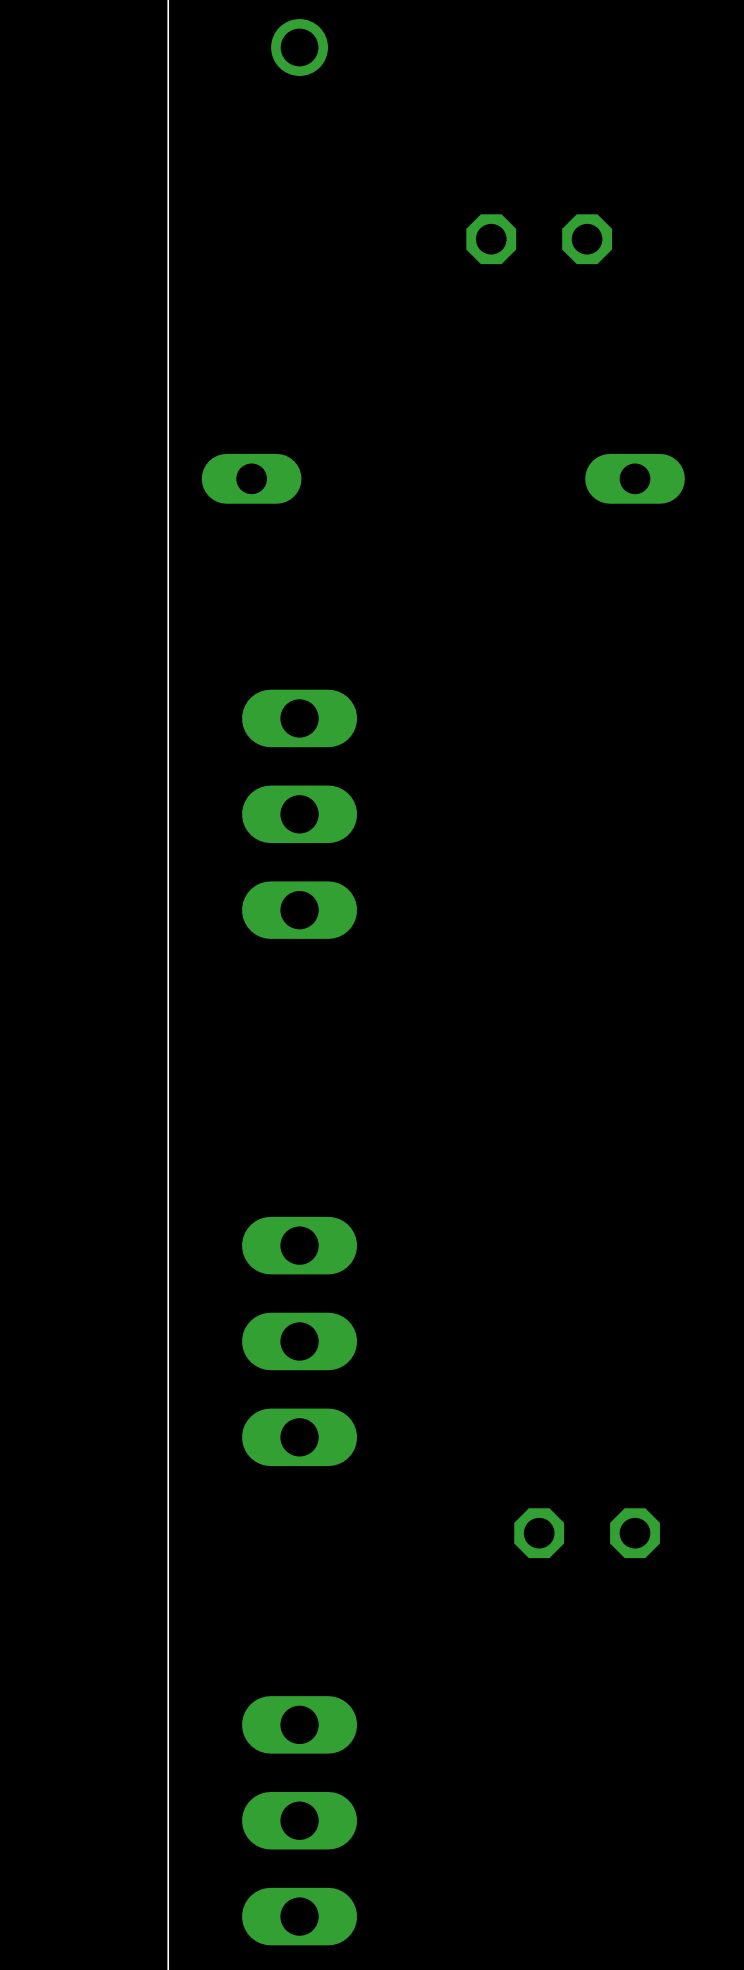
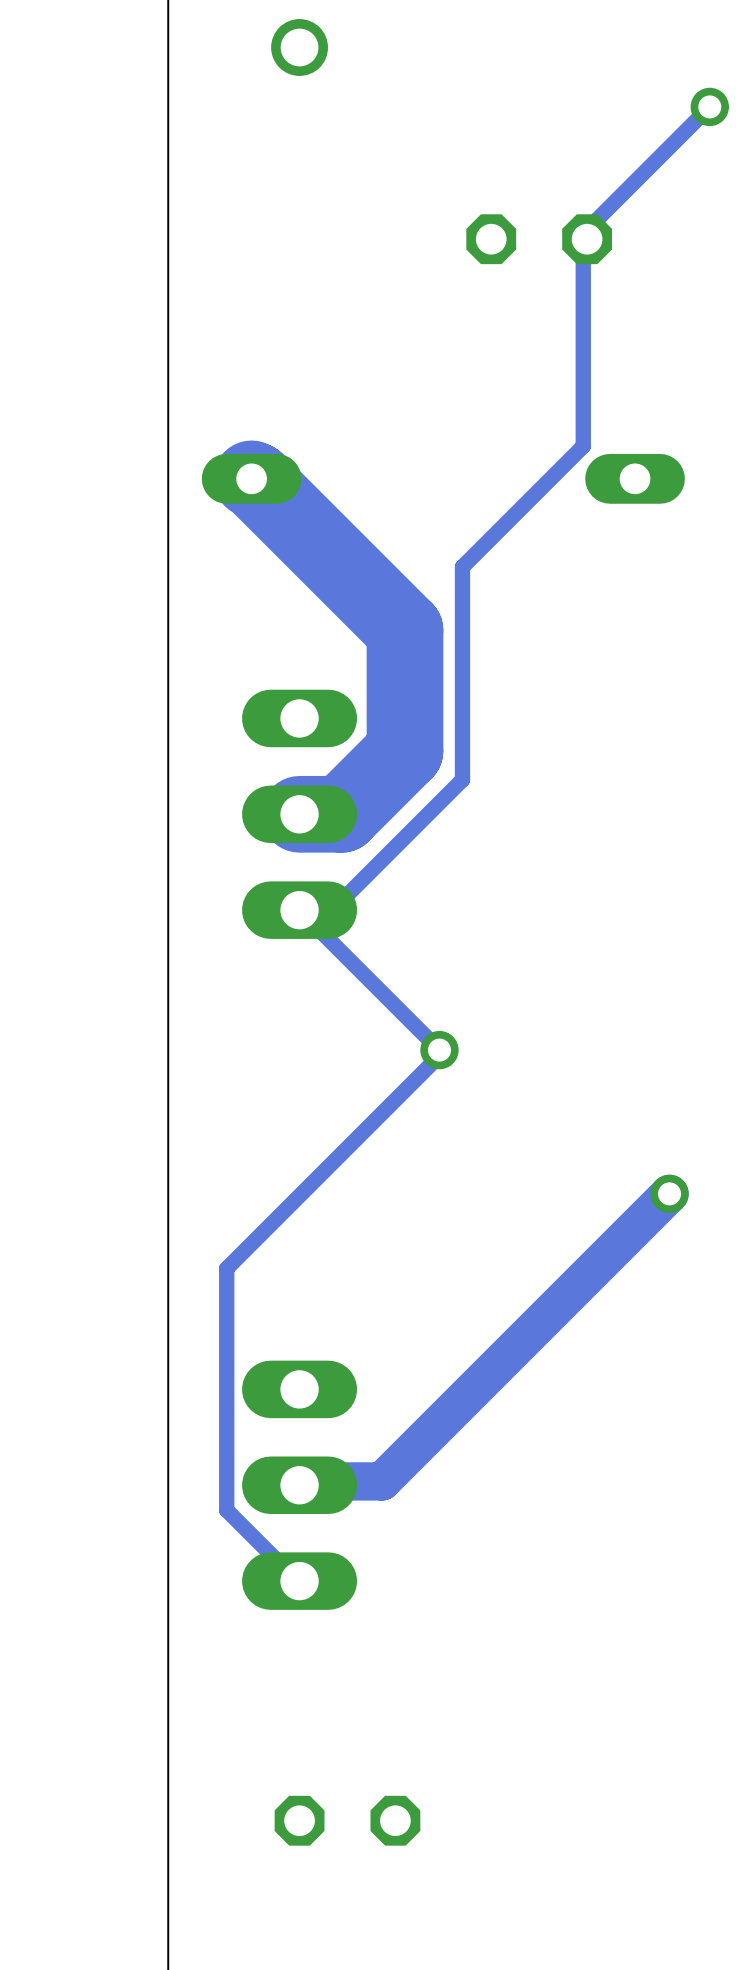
track: none -> (709, 106) (583, 233) (587, 239) (583, 239) (583, 446) (462, 567) (462, 779) (318, 923) (299, 910) (439, 1050) (439, 1055) (226, 1268) (226, 1510) (299, 1581)
via: none -> (709, 106)
track: none -> (251, 478) (404, 630) (404, 751) (341, 814) (299, 814)
via: none -> (439, 1050)
track: none -> (669, 1193) (381, 1481) (301, 1481) (299, 1485)
via: none -> (669, 1193)
part position: (299, 1341) -> (299, 1485)
part position: (587, 1533) -> (347, 1820)
part: (299, 1820) -> none

